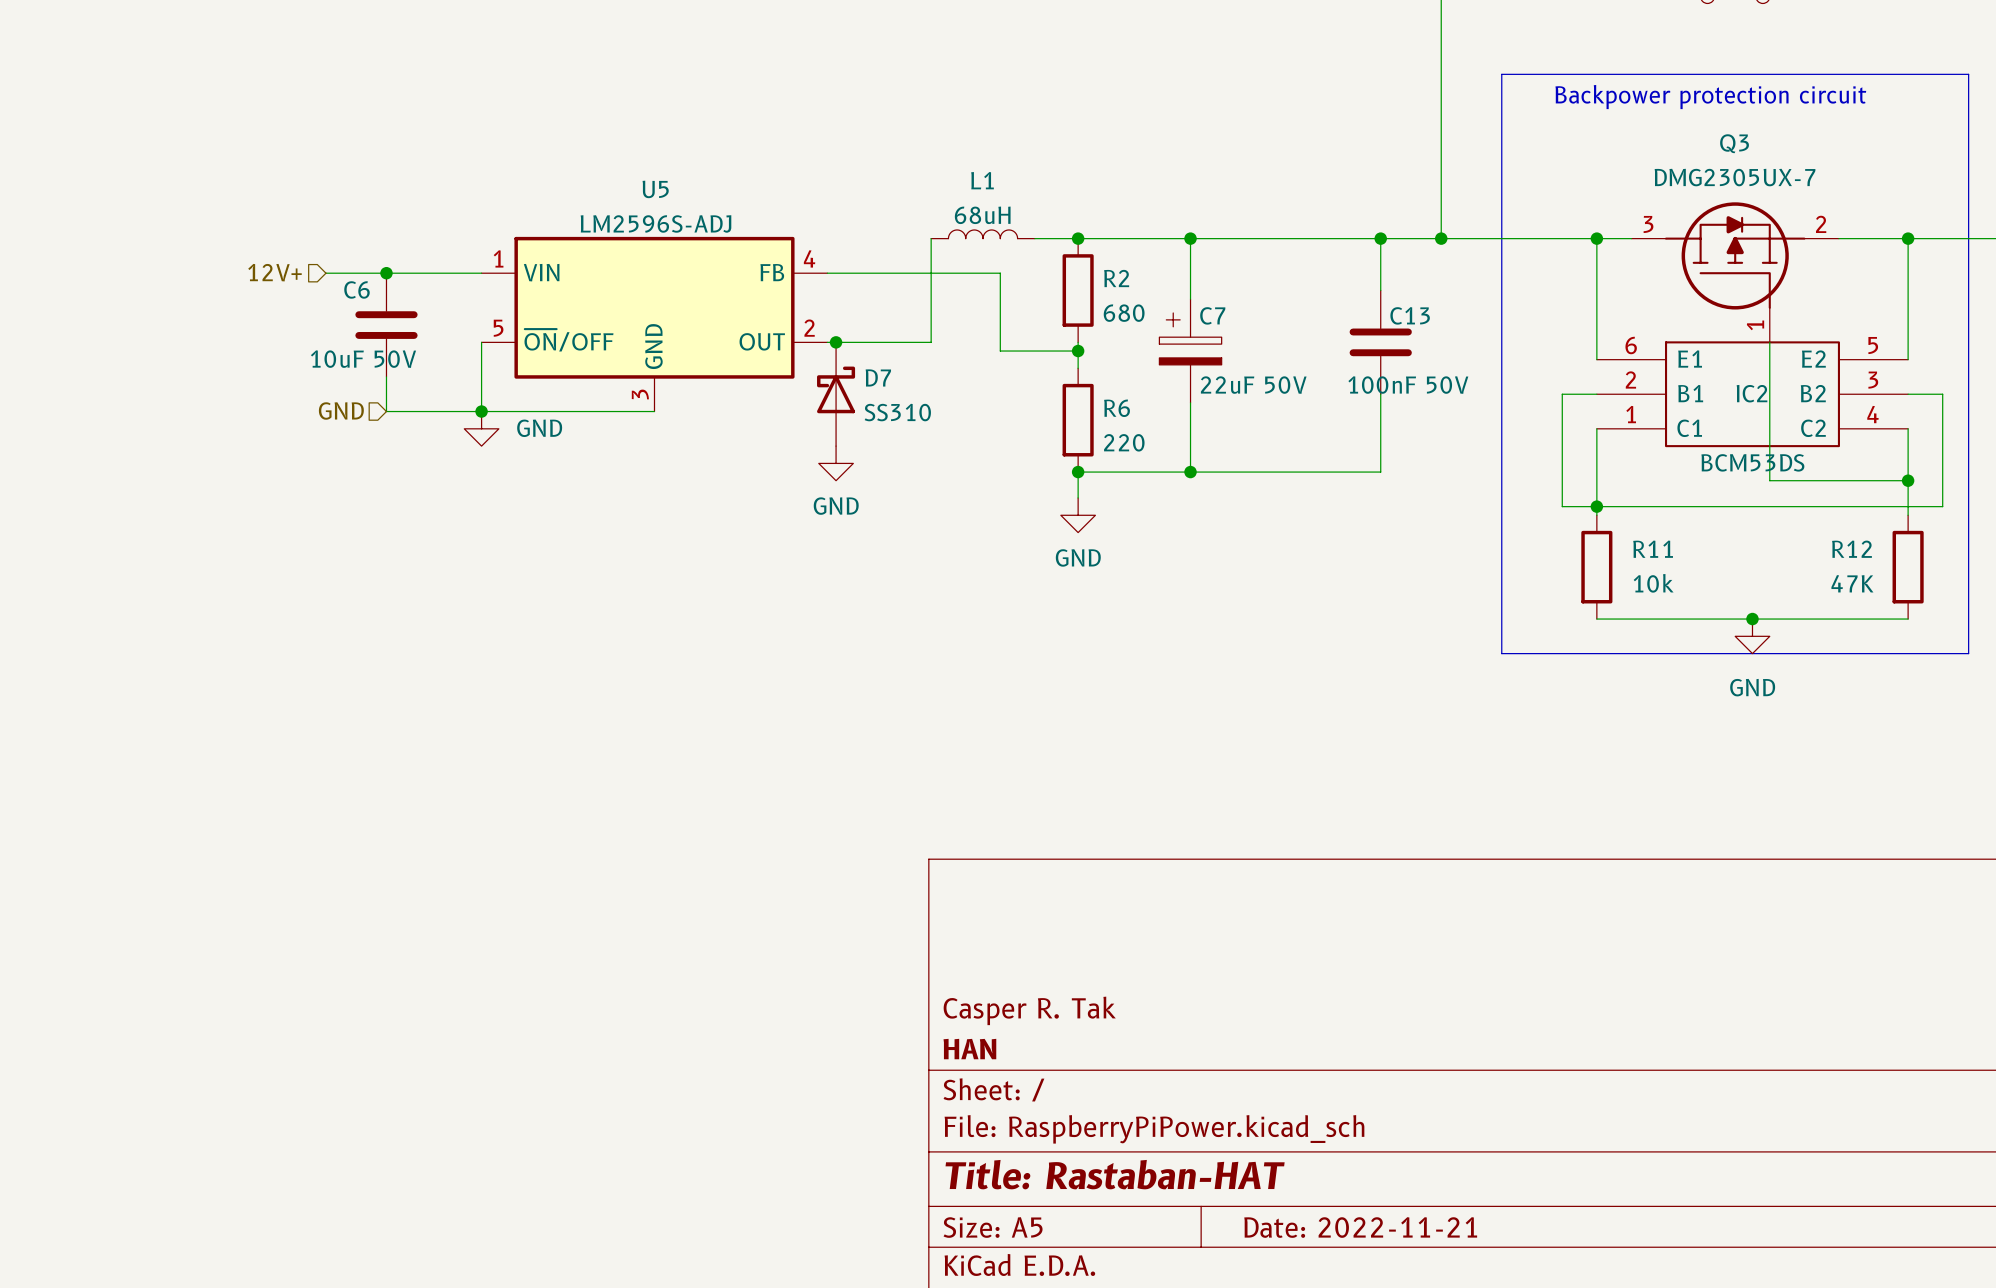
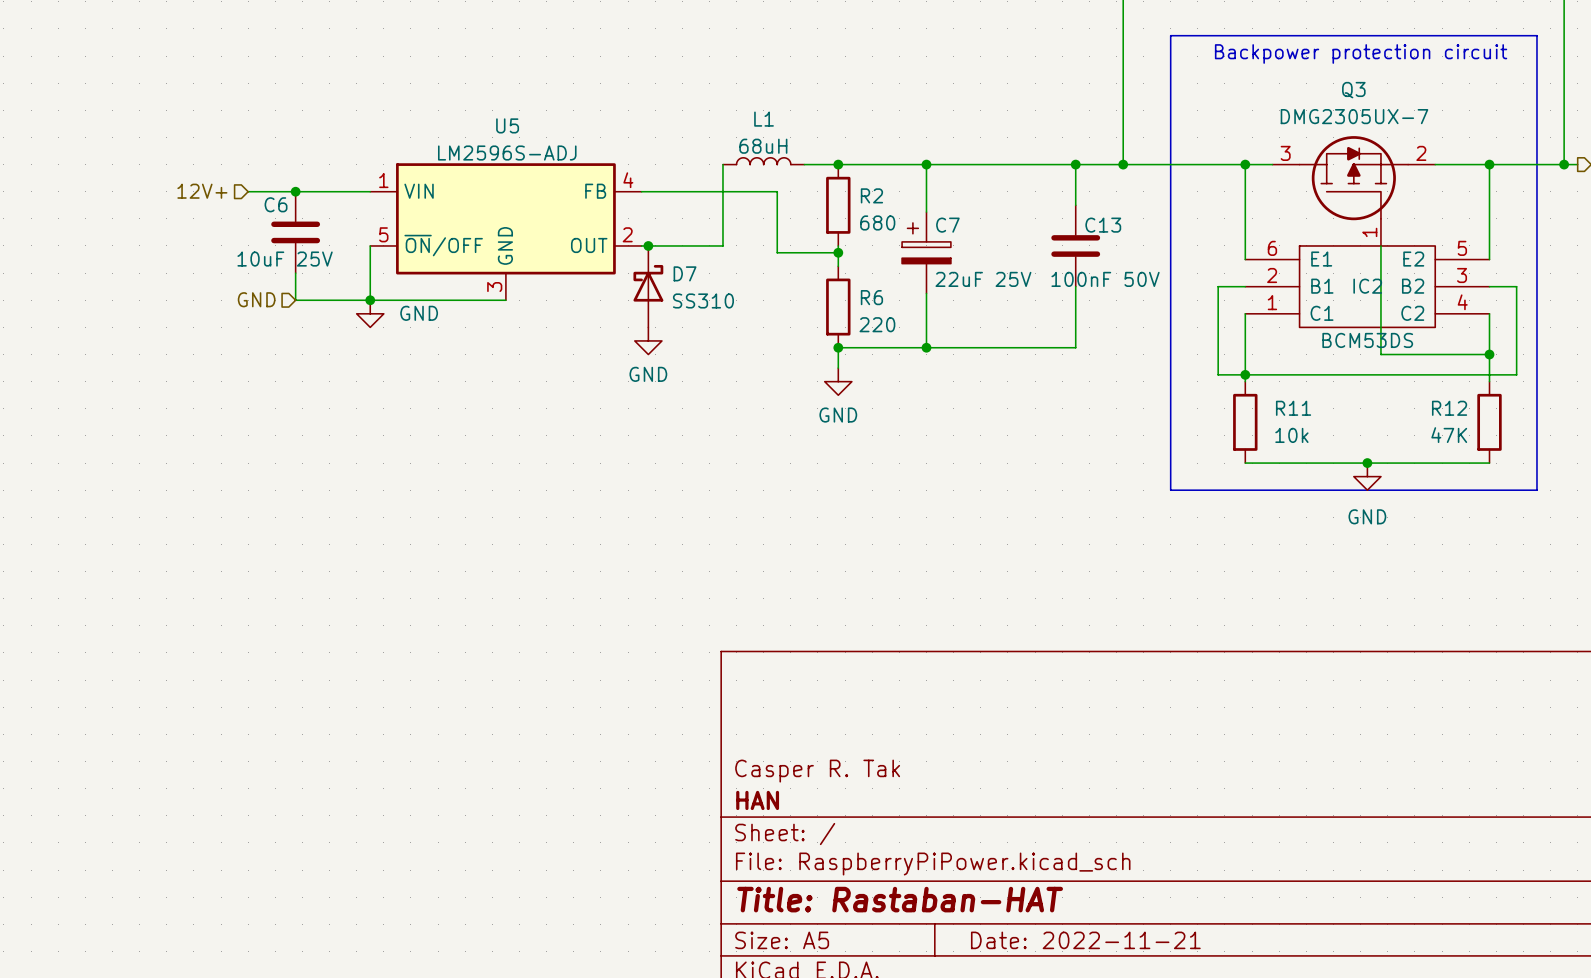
C6 value: 10uF 50V (363, 359) -> 10uF 25V (285, 259)
C7 value: 22uF 50V (1253, 385) -> 22uF 25V (983, 279)

